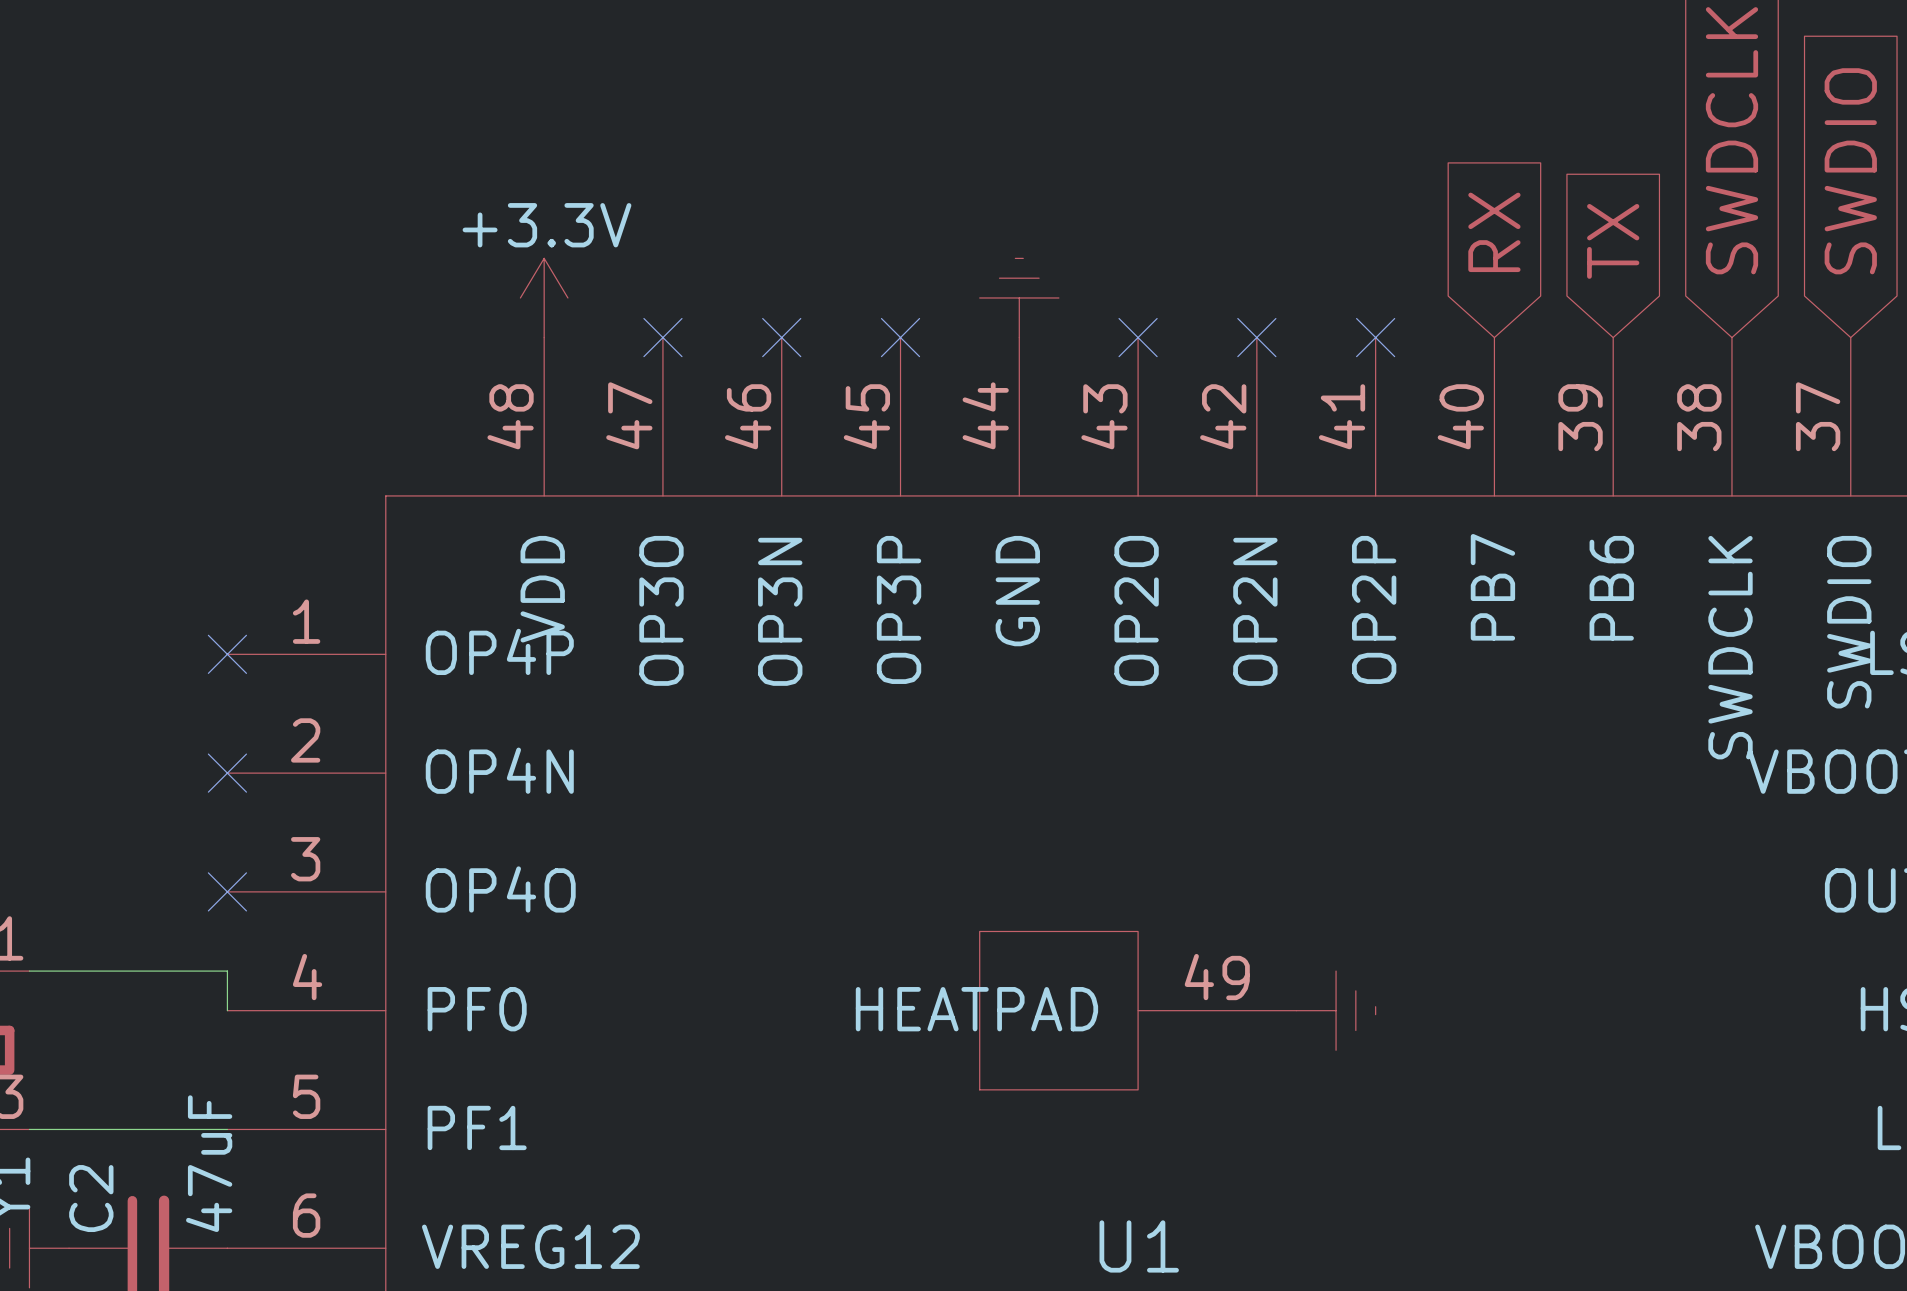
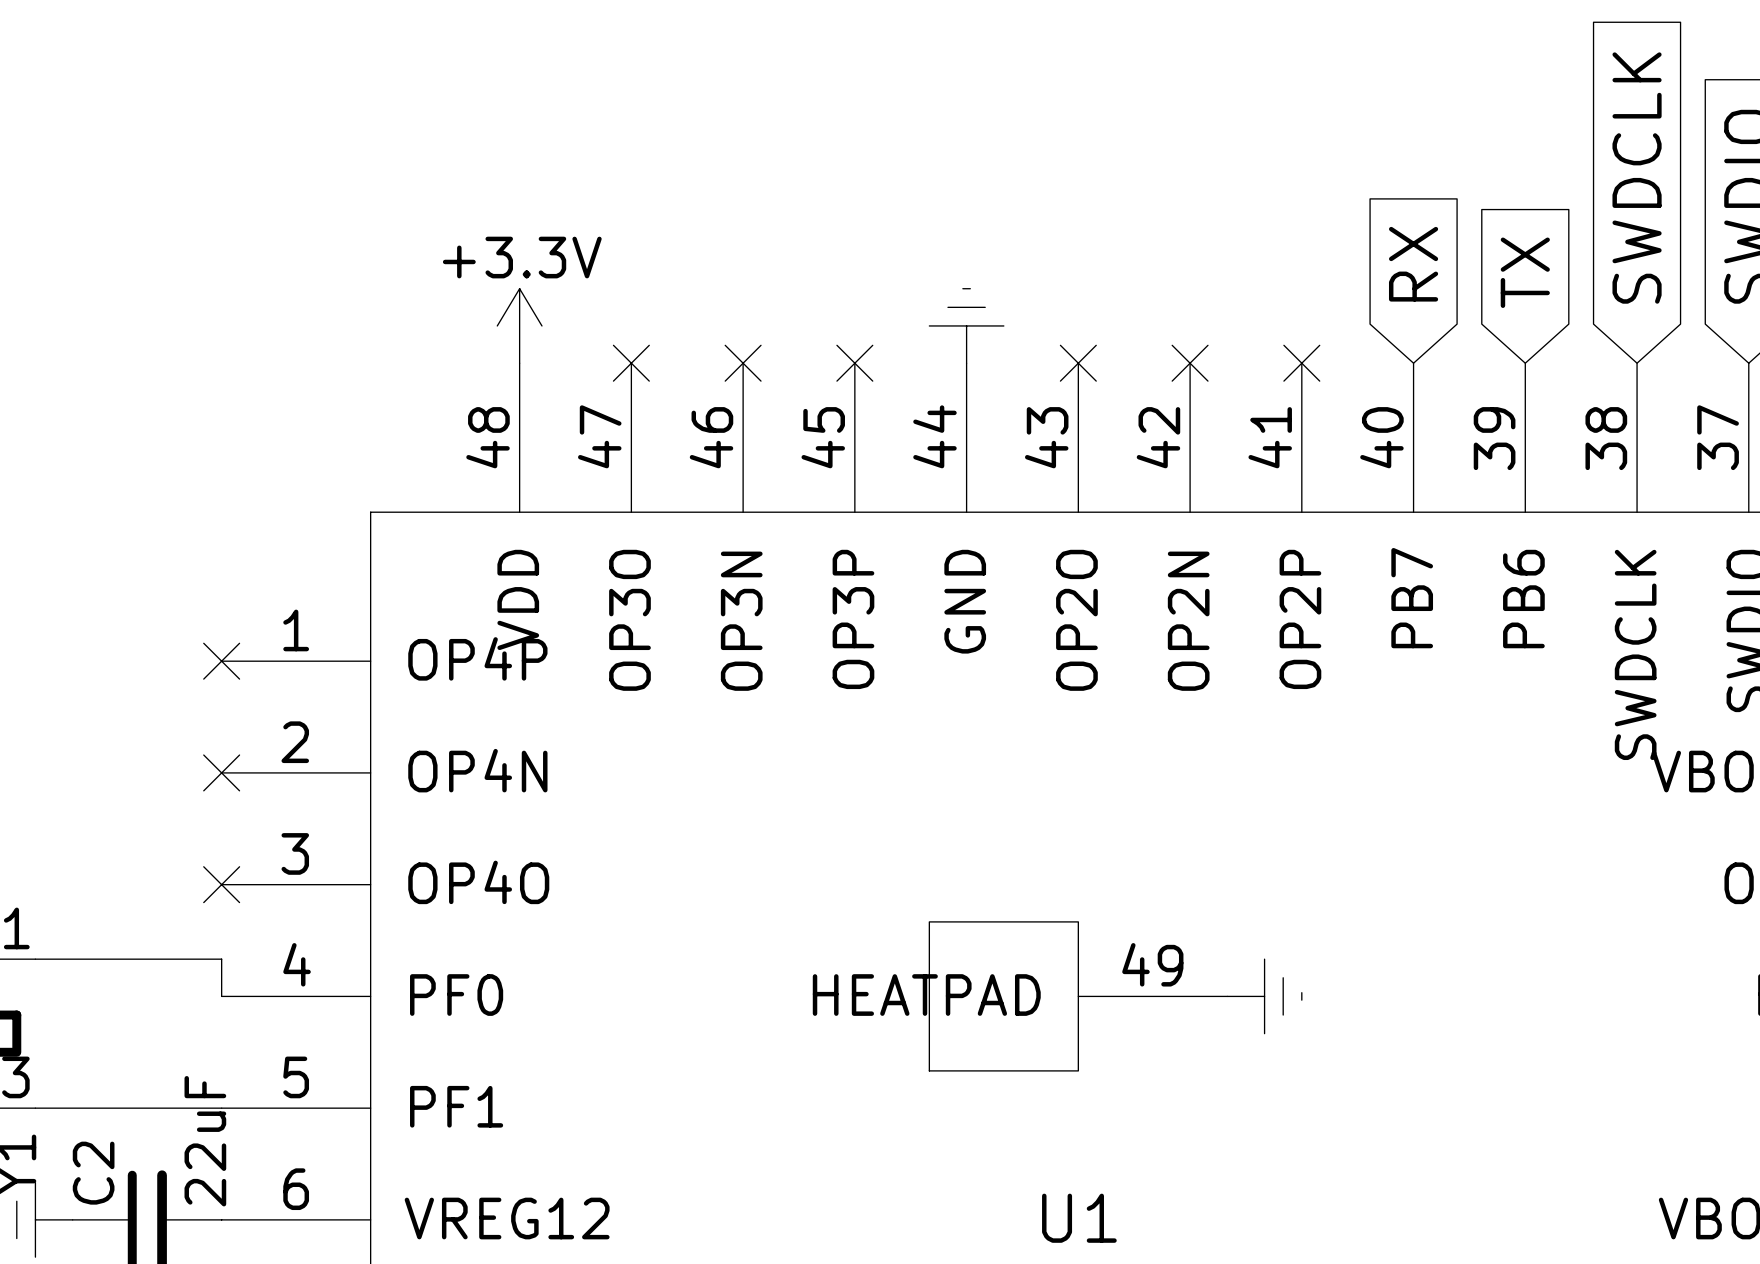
C2 value: 47uF (209, 1163) -> 22uF (205, 1141)

